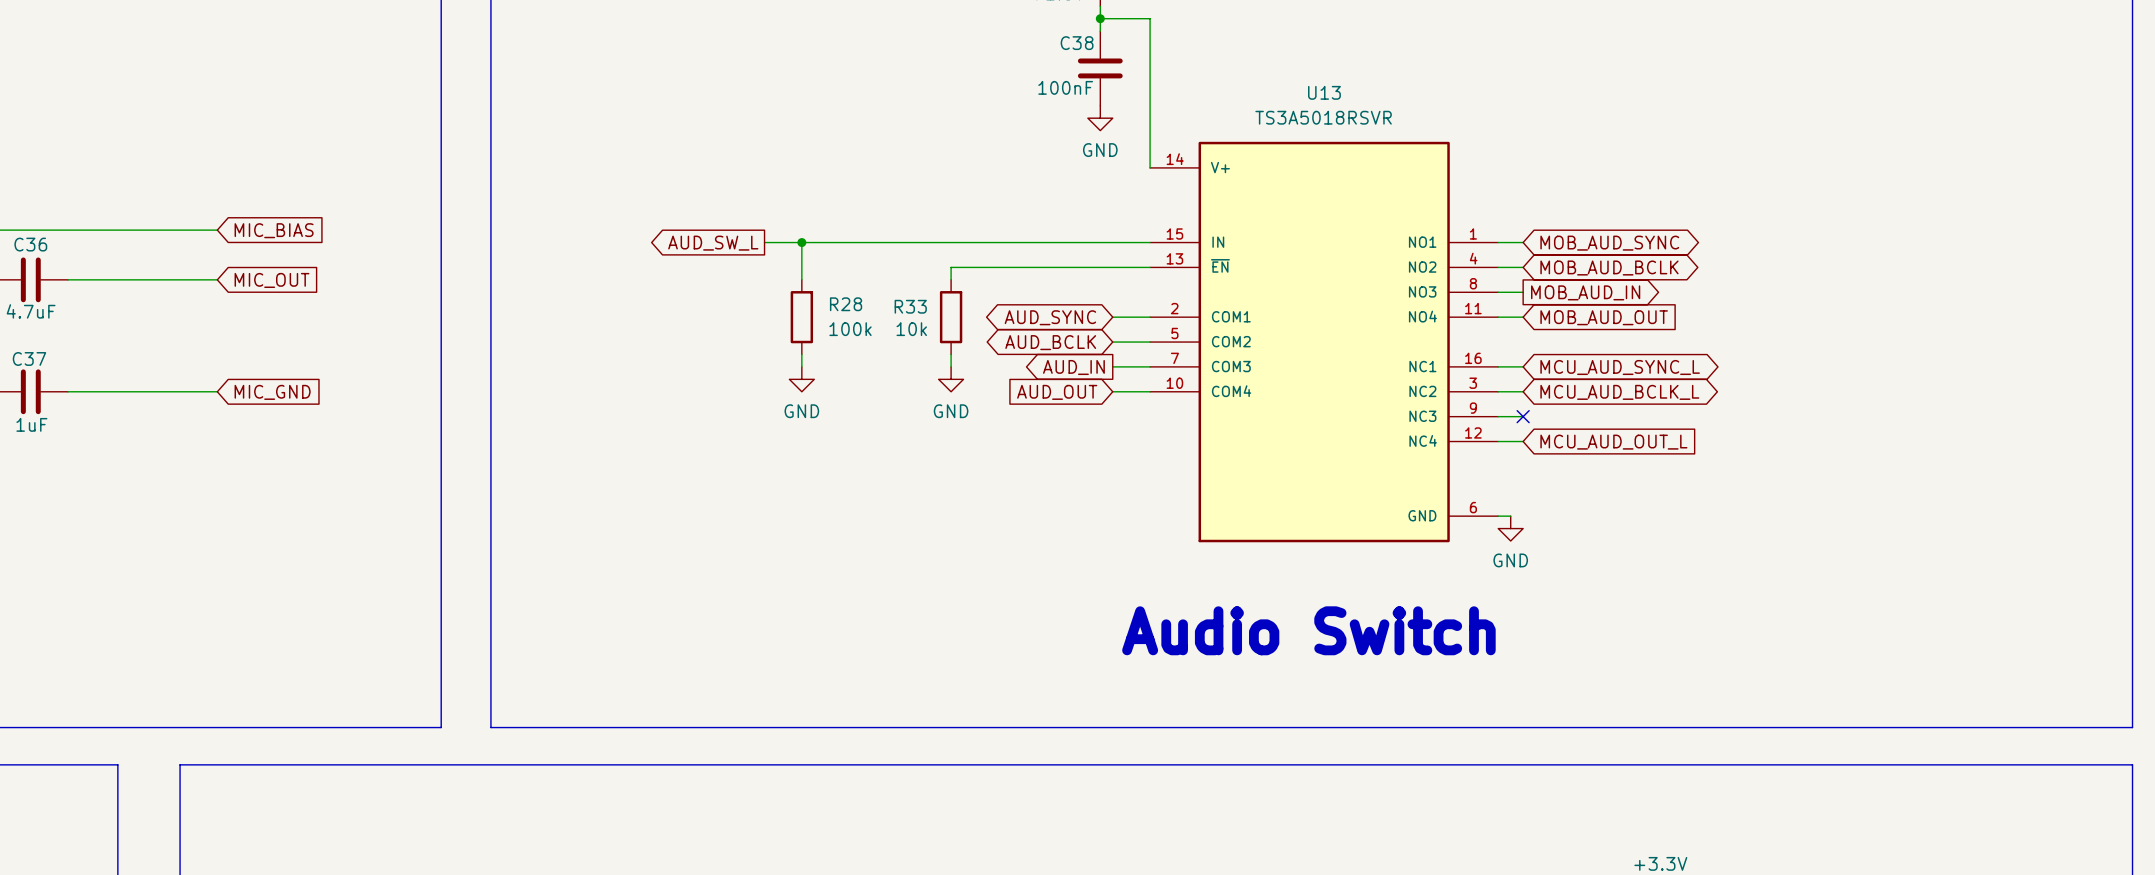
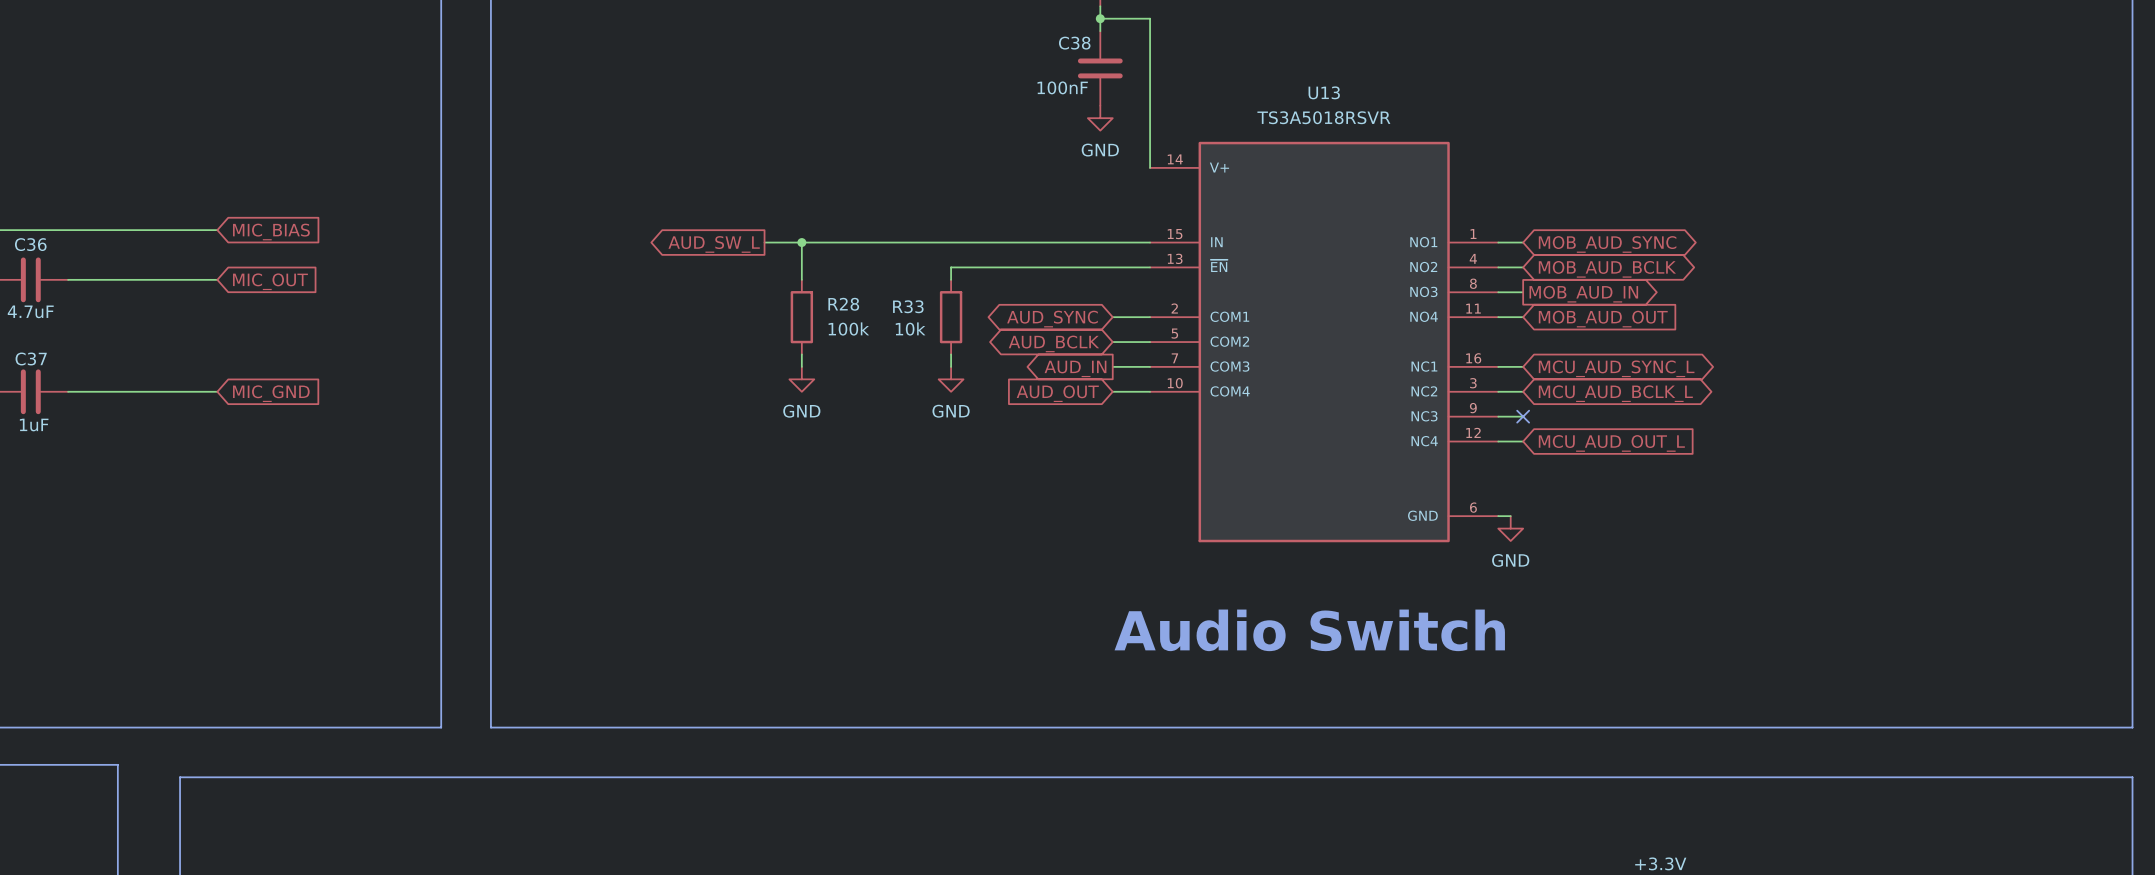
line: (180, 777) (180, 764) (2132, 764) (2132, 777) -> (180, 777) (2132, 777)

